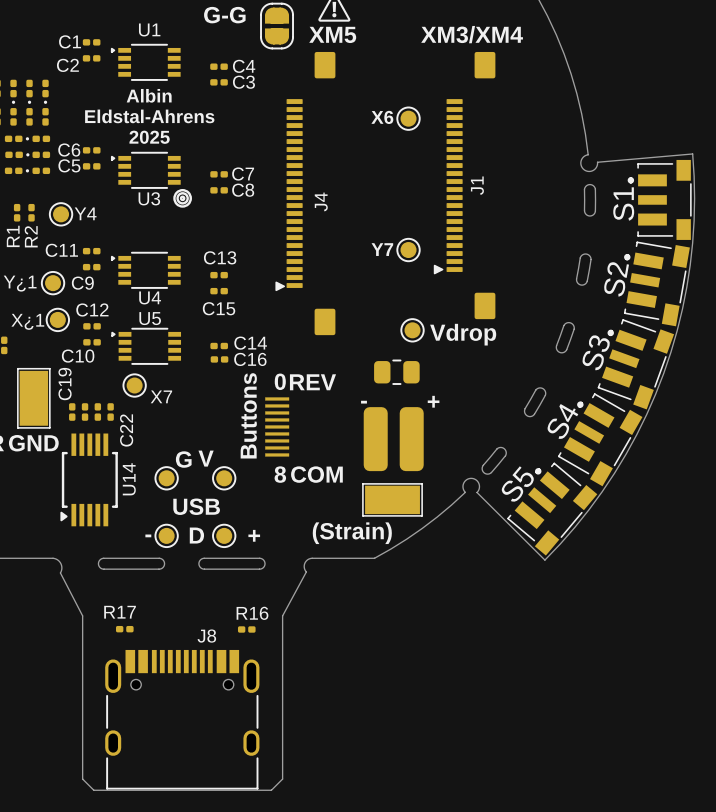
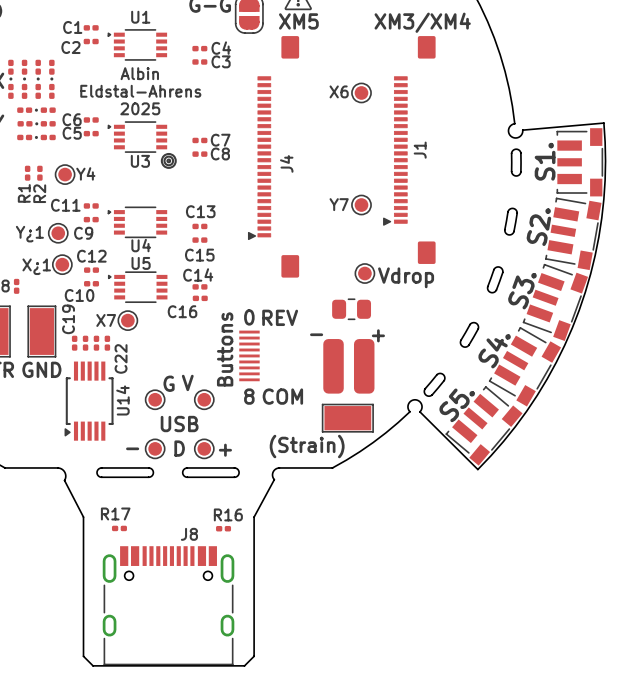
C14 name position: C14 (250, 343) -> C14 (198, 274)
C16 name position: C16 (250, 359) -> C16 (182, 311)
X7 name position: X7 (161, 396) -> X7 (106, 320)

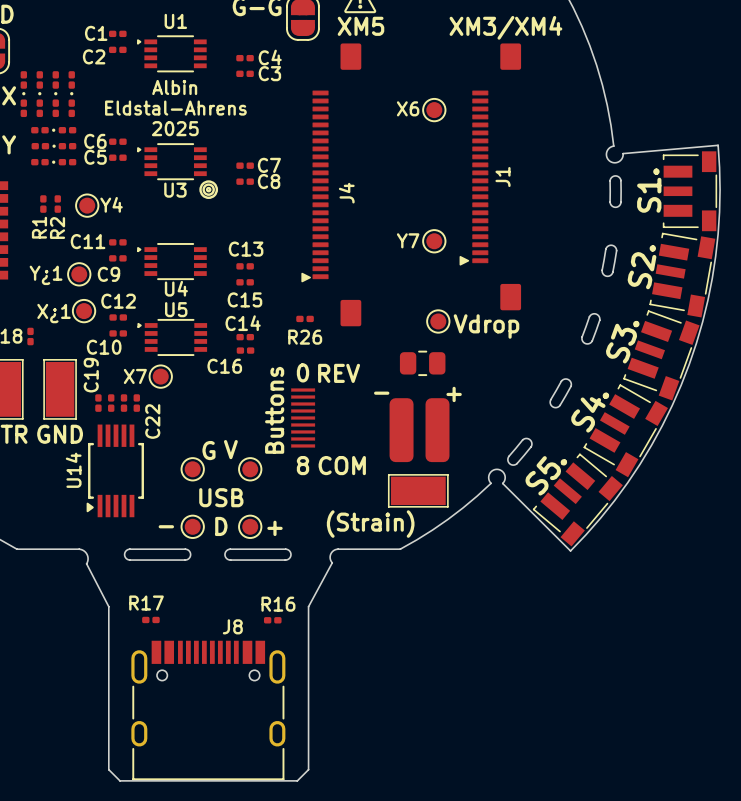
R26: none -> (305, 318)
U14 name position: U14 (122, 400) -> U14 (73, 470)

